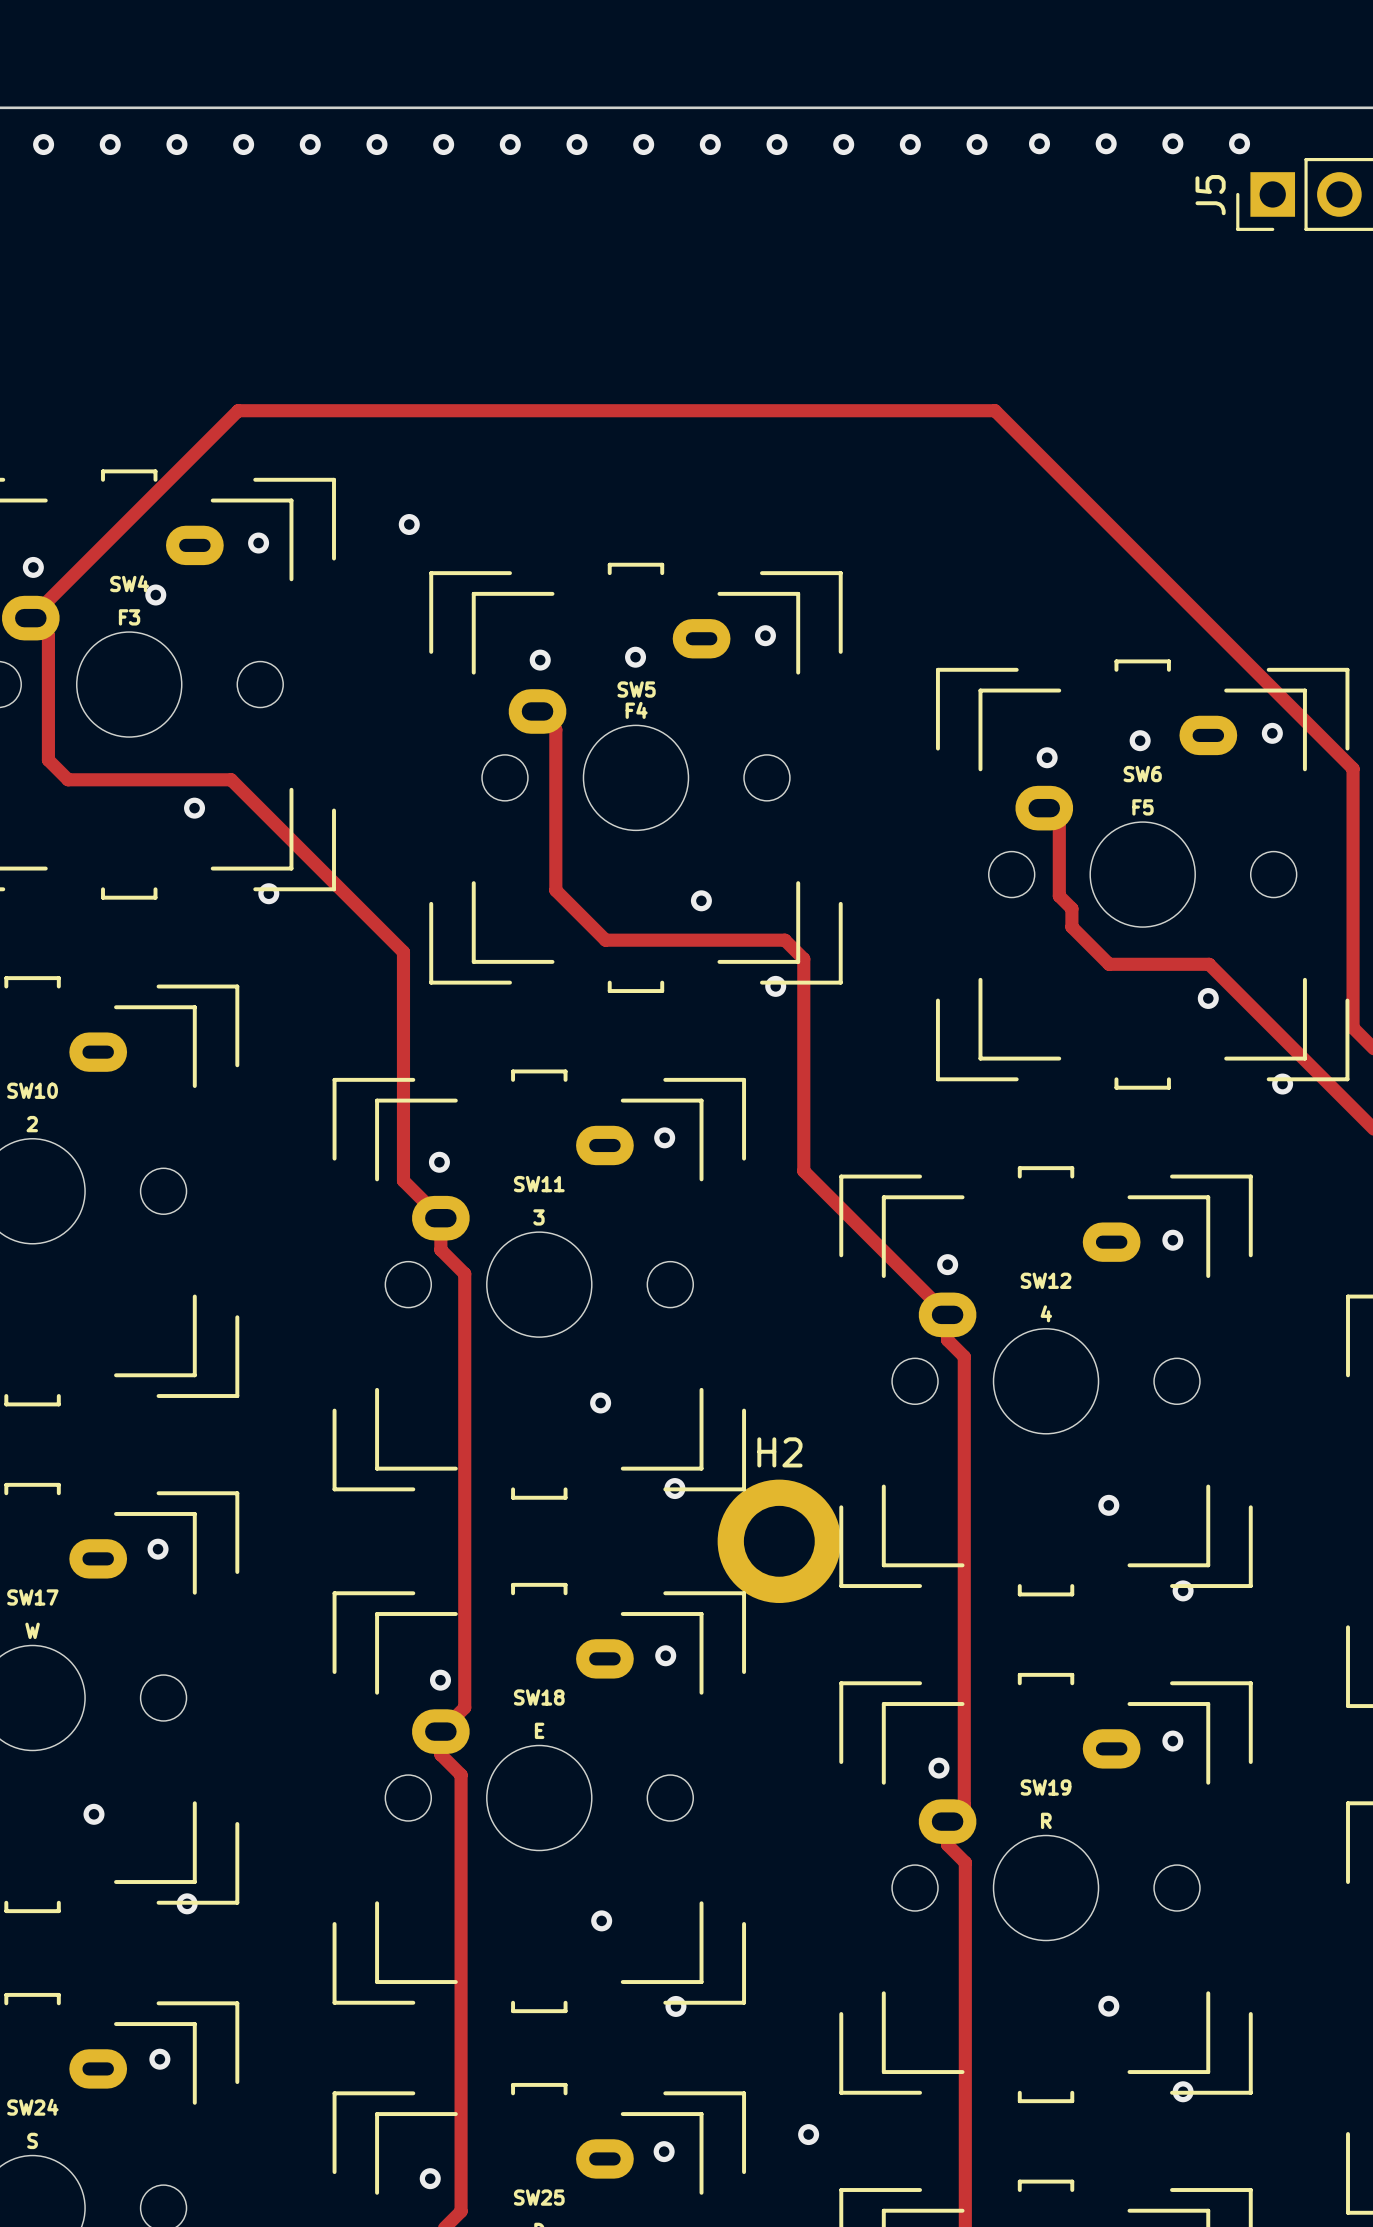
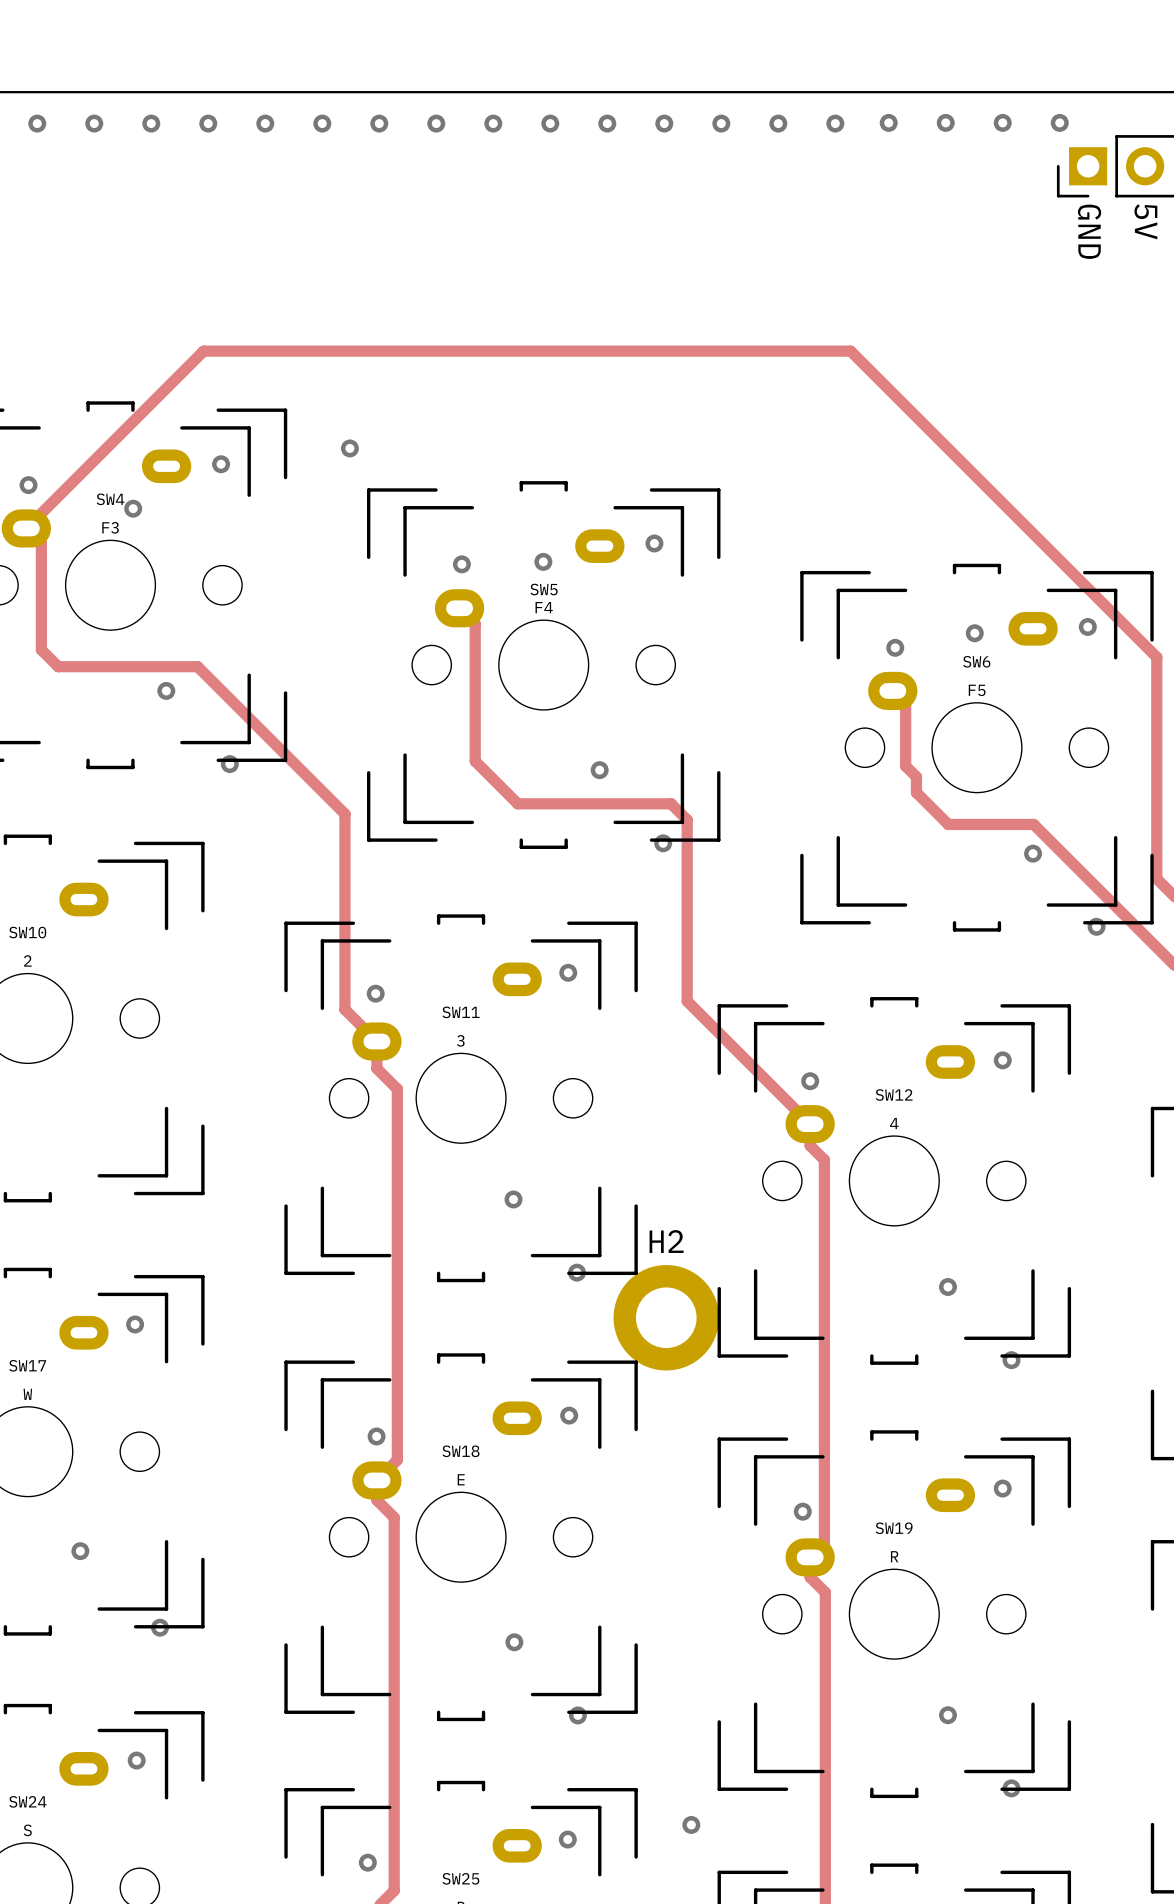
J5 name: J5 (1210, 195) -> none
text: none -> 5V (1145, 221)
text: none -> GND (1089, 231)

